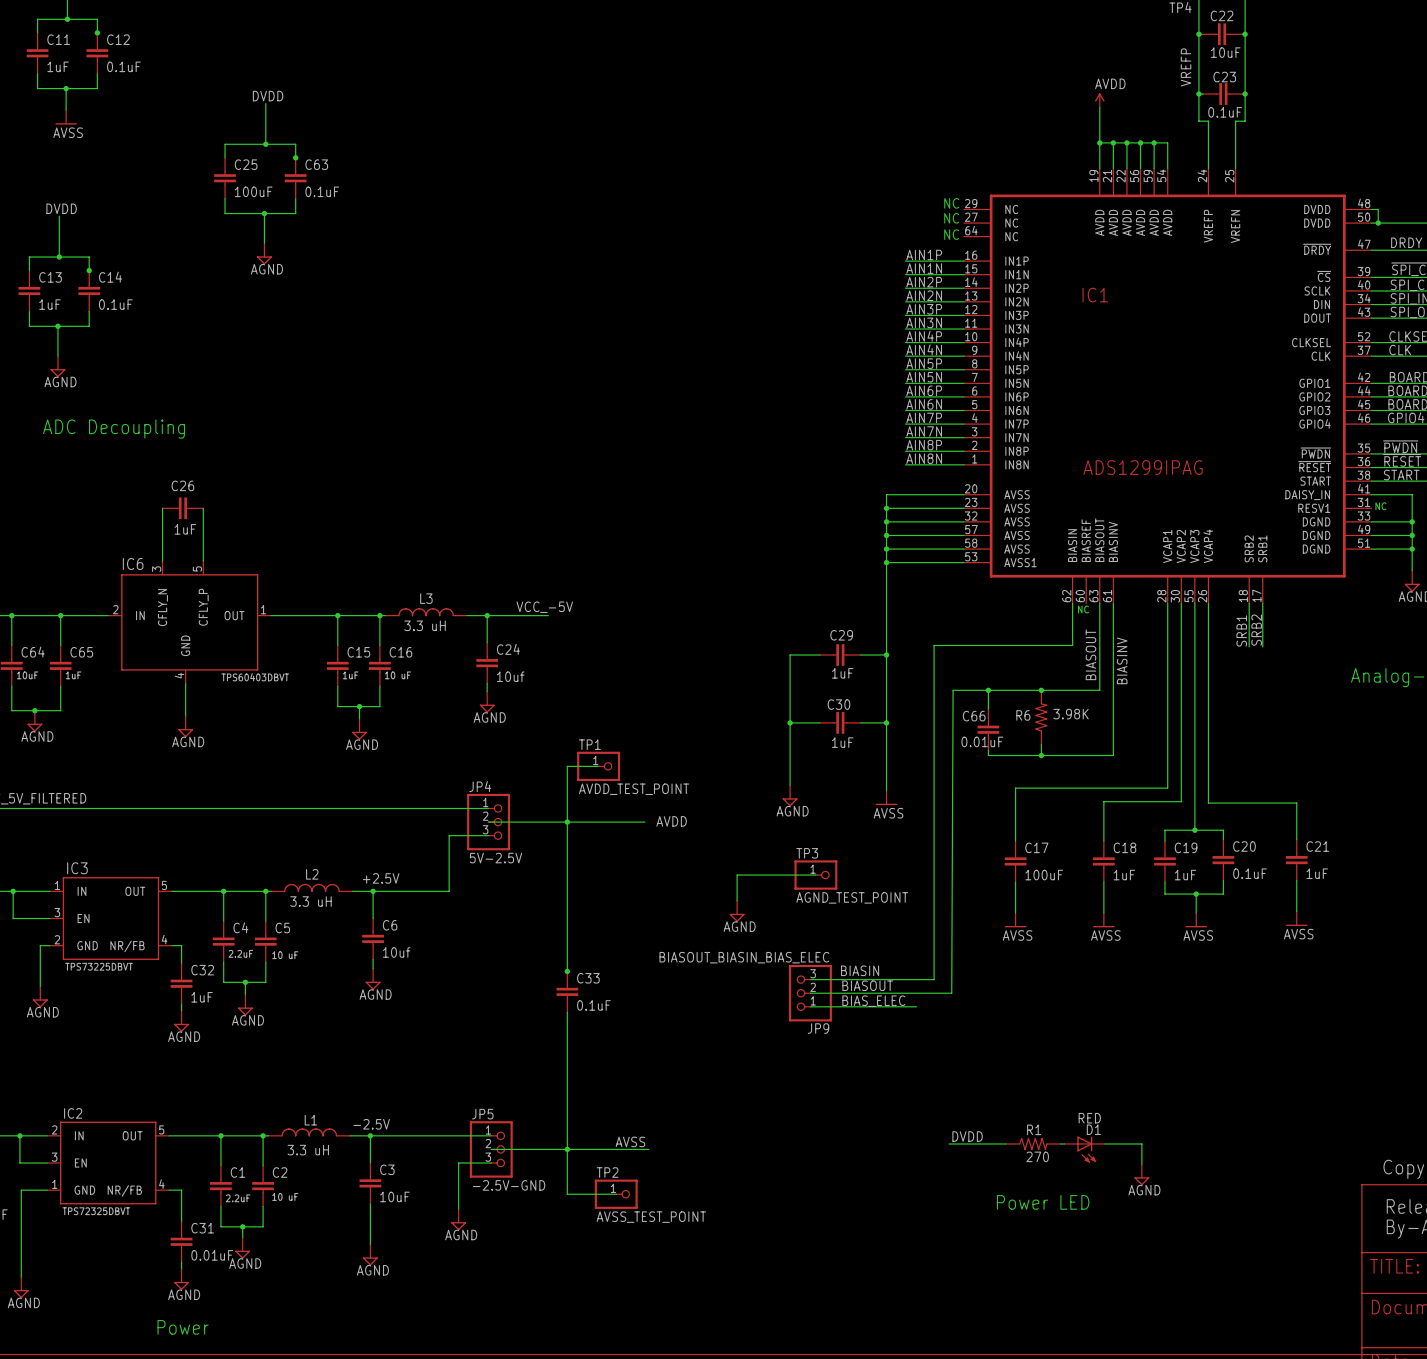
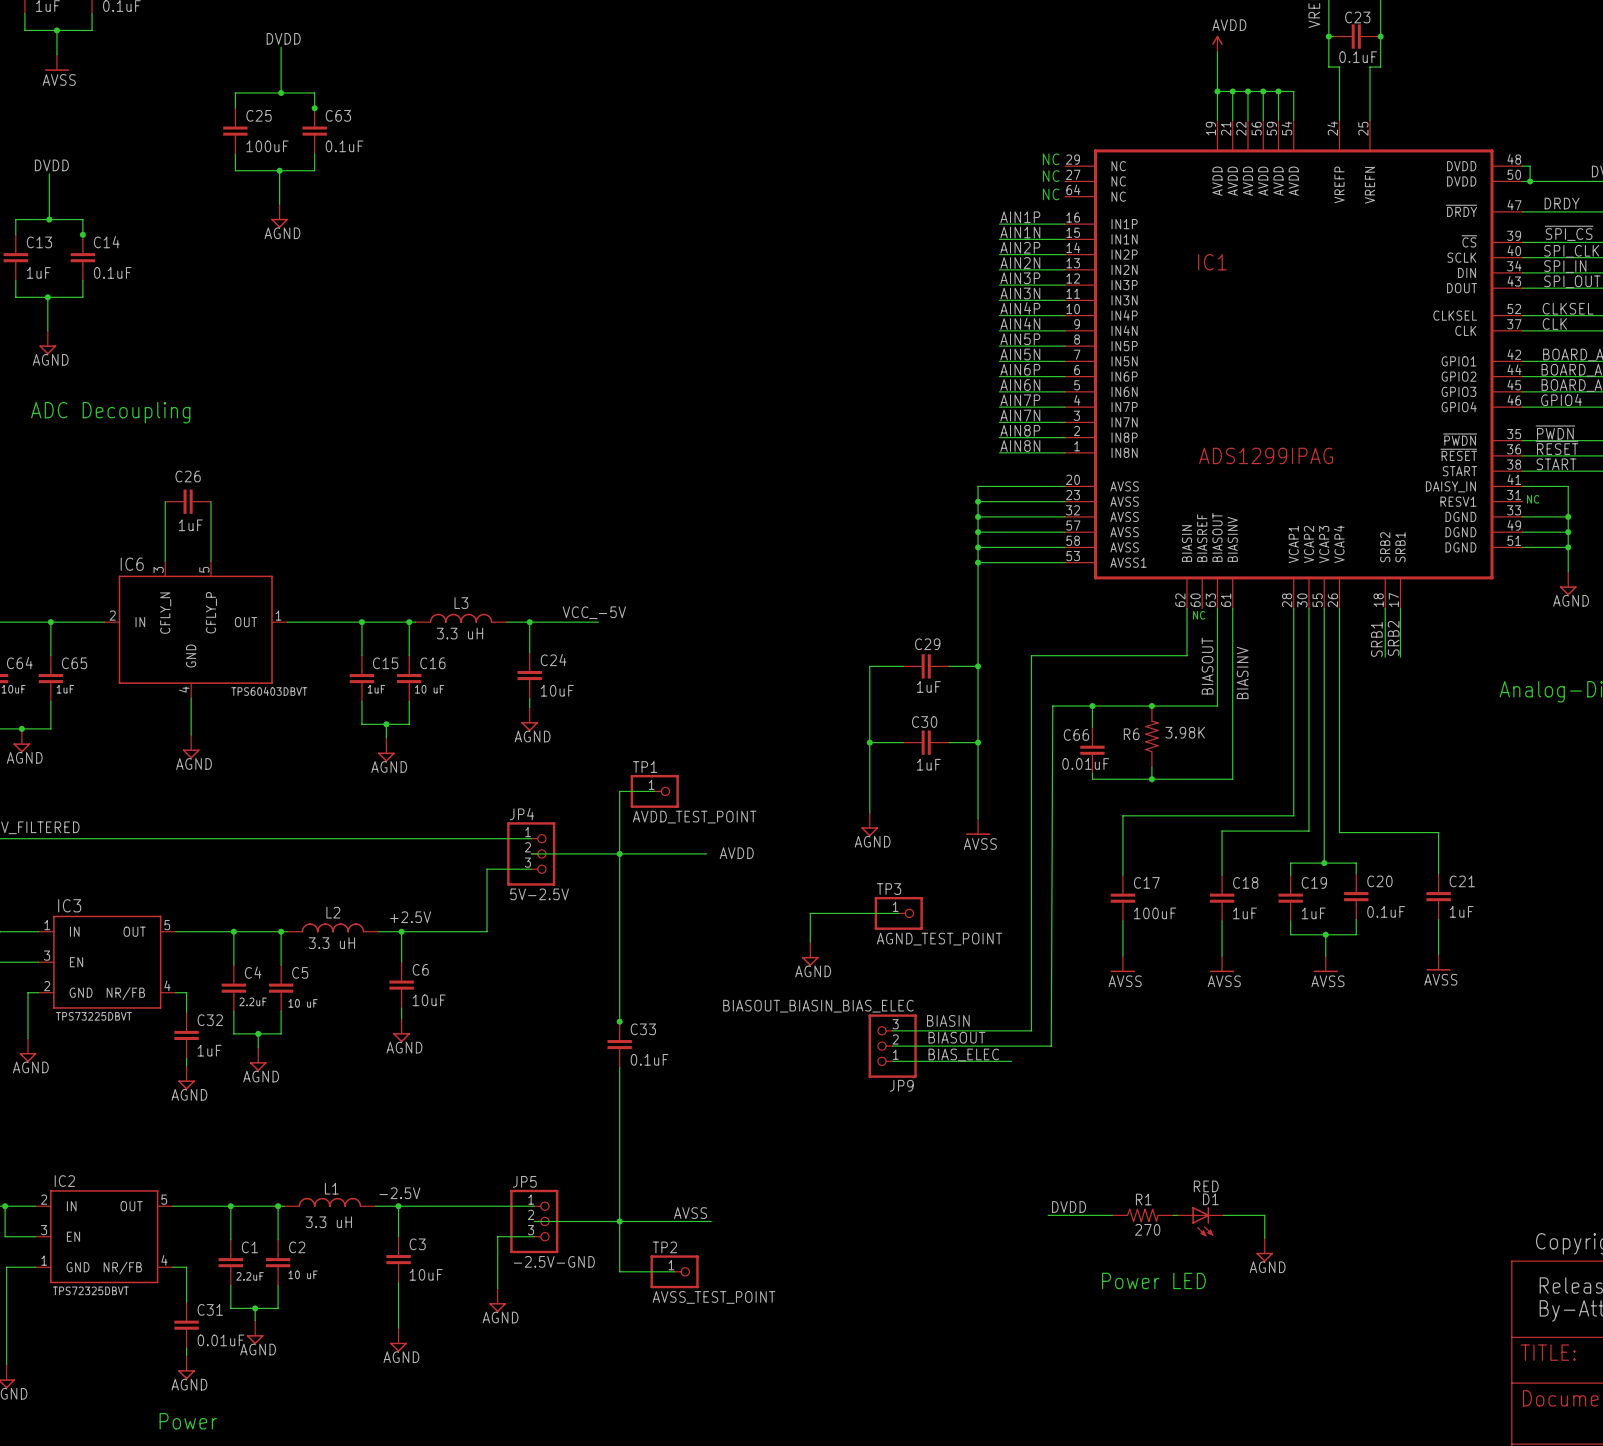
C24 value: 10uf (510, 676) -> 10uF (557, 690)
C6 value: 10uf (396, 952) -> 10uF (429, 1000)

